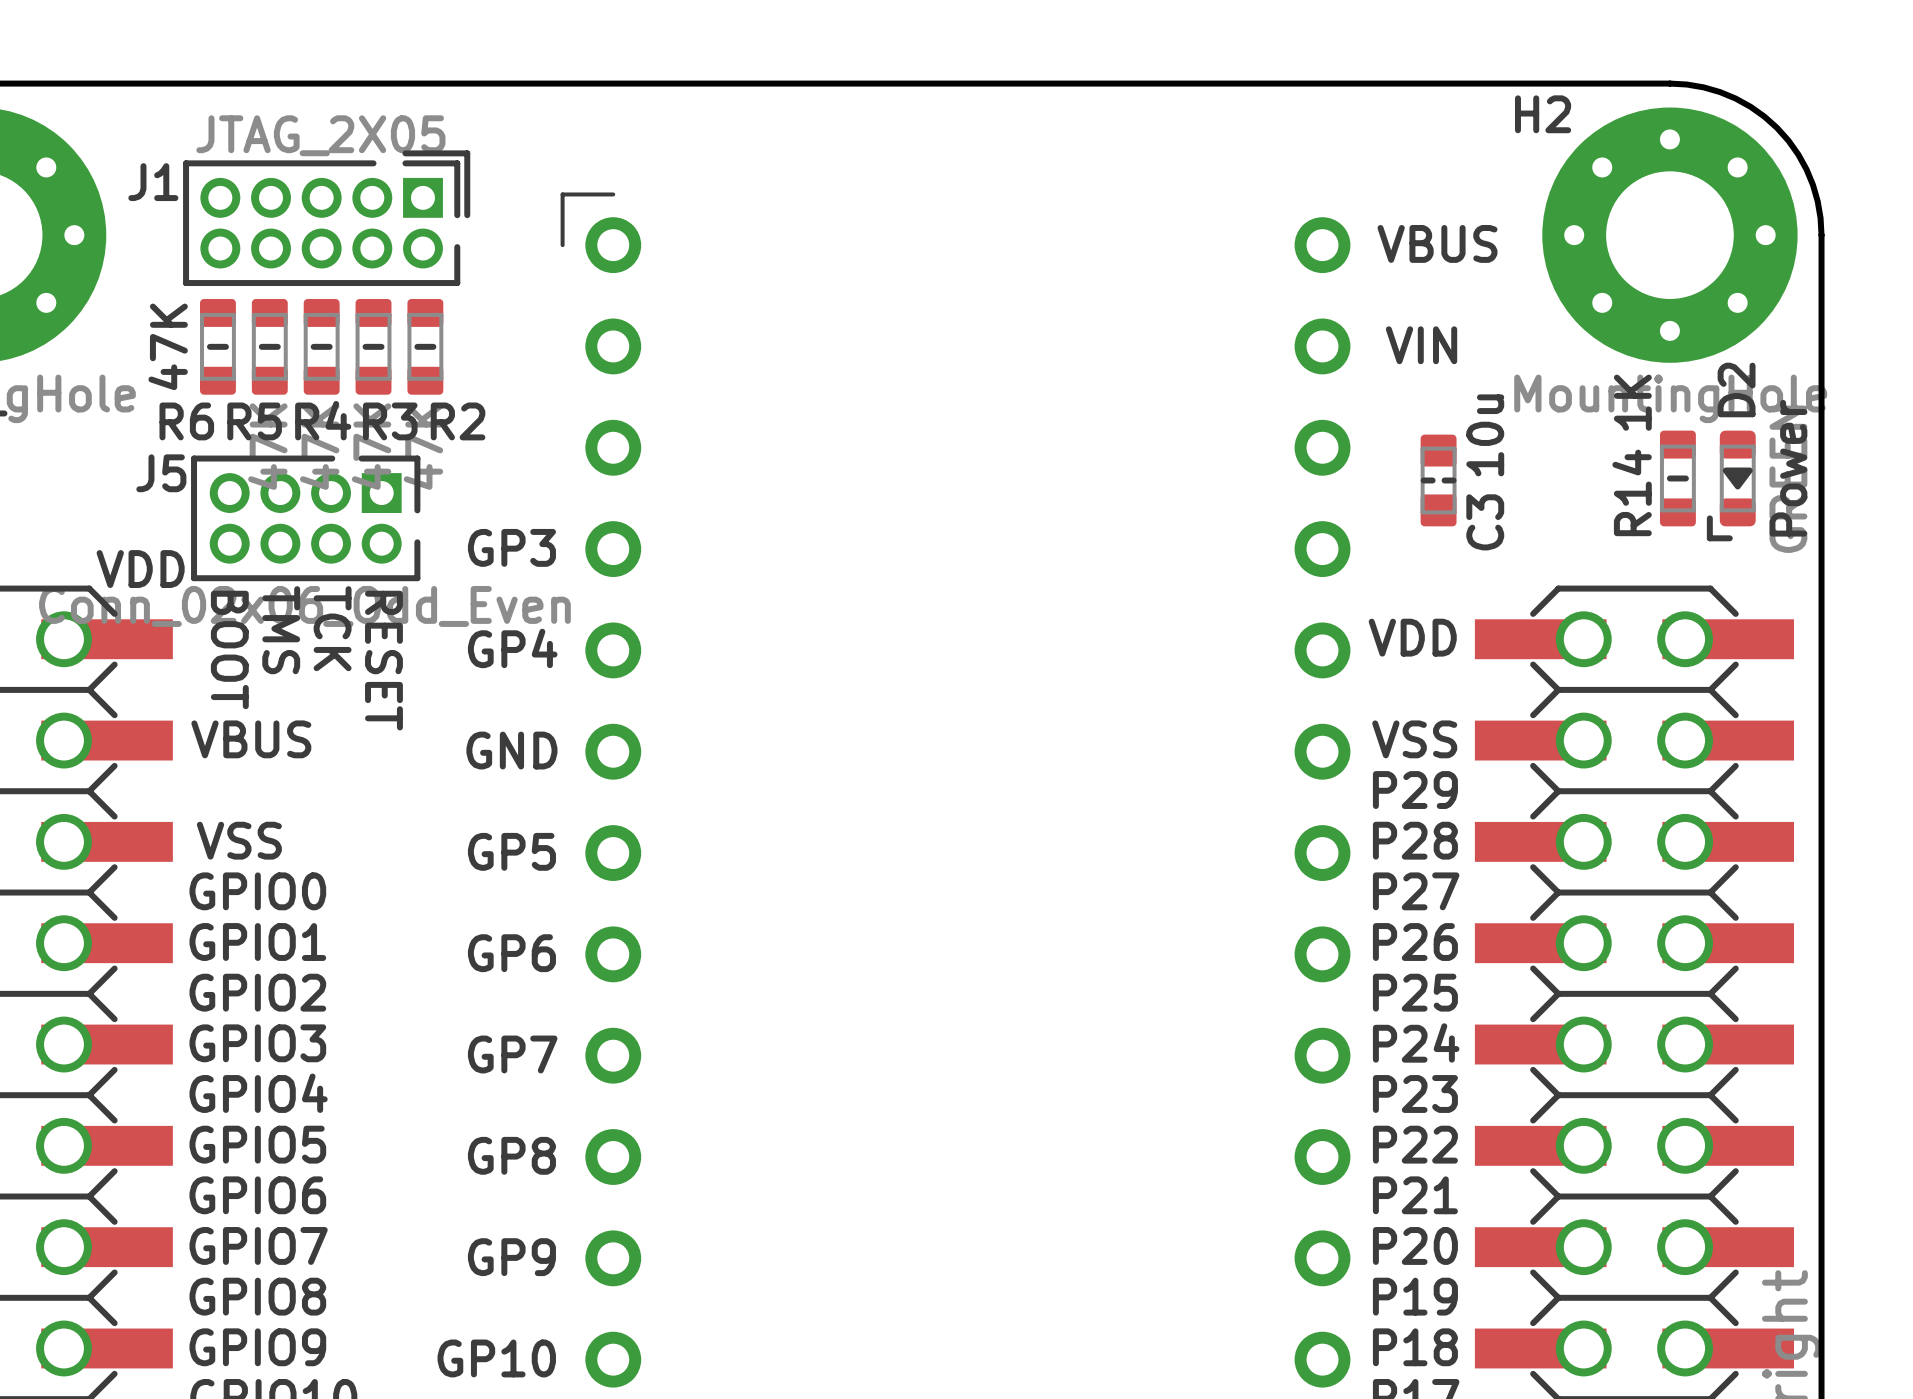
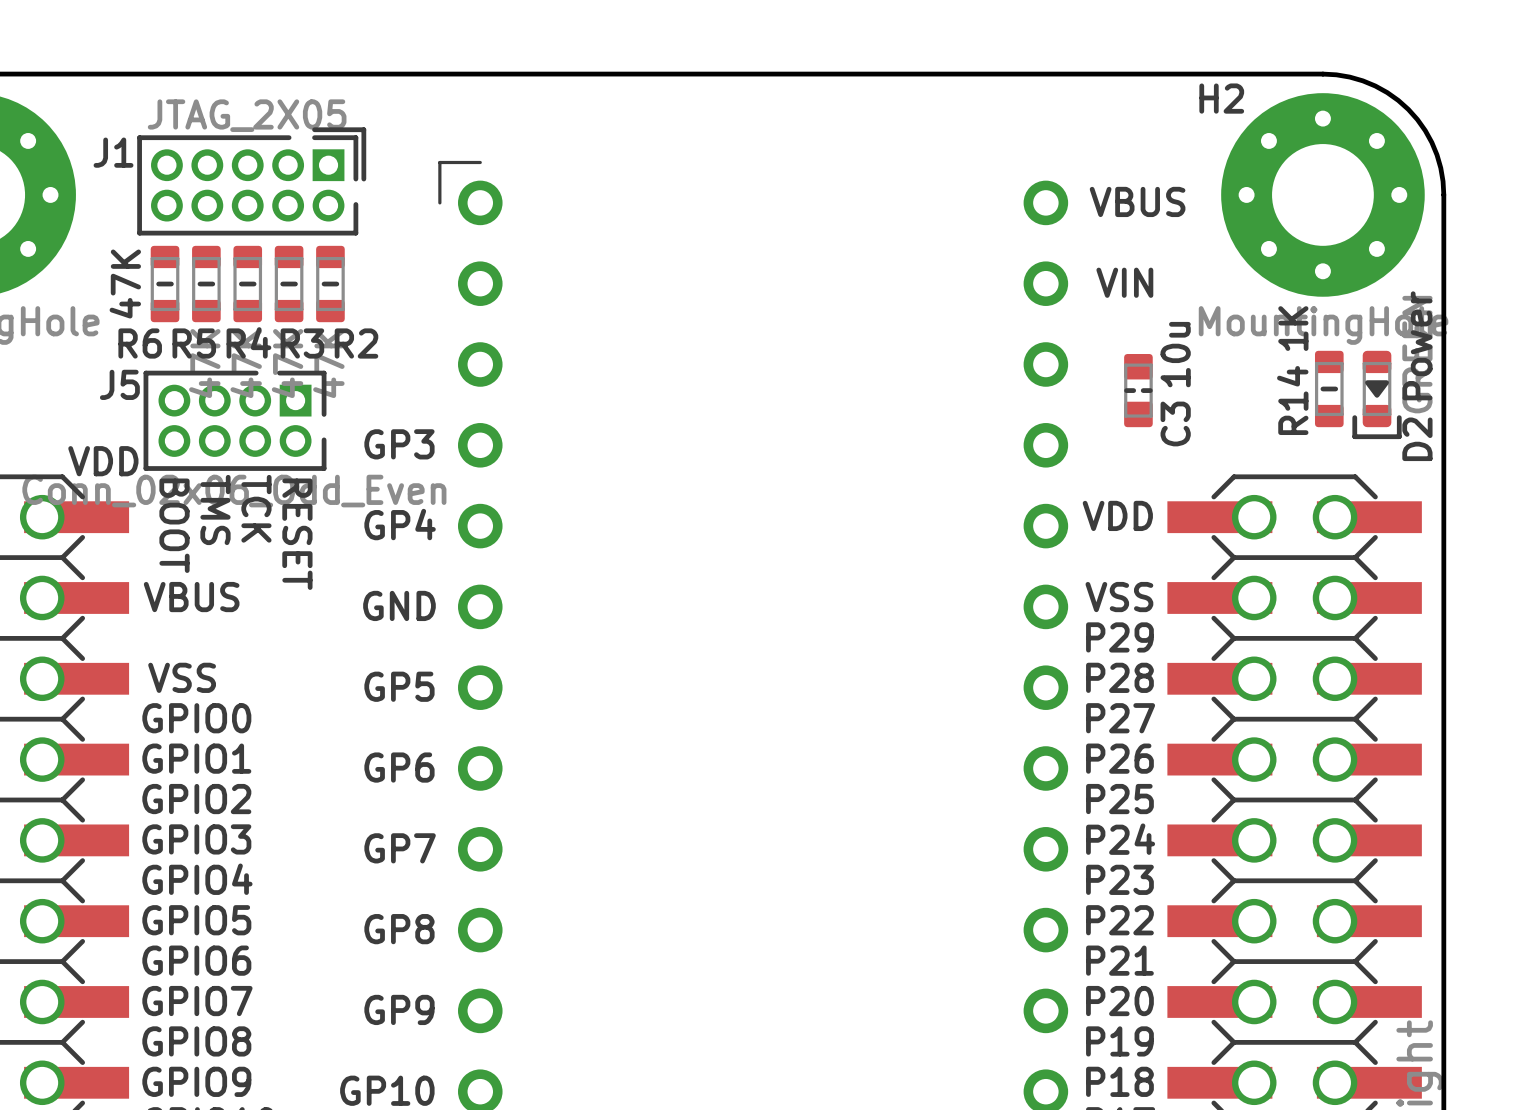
D2 name position: D2 (1736, 389) -> D2 (1417, 439)
D2 footprint: [1706, 430, 1756, 542] -> [1352, 350, 1402, 440]
text position: Power (1788, 468) -> Power (1417, 345)

